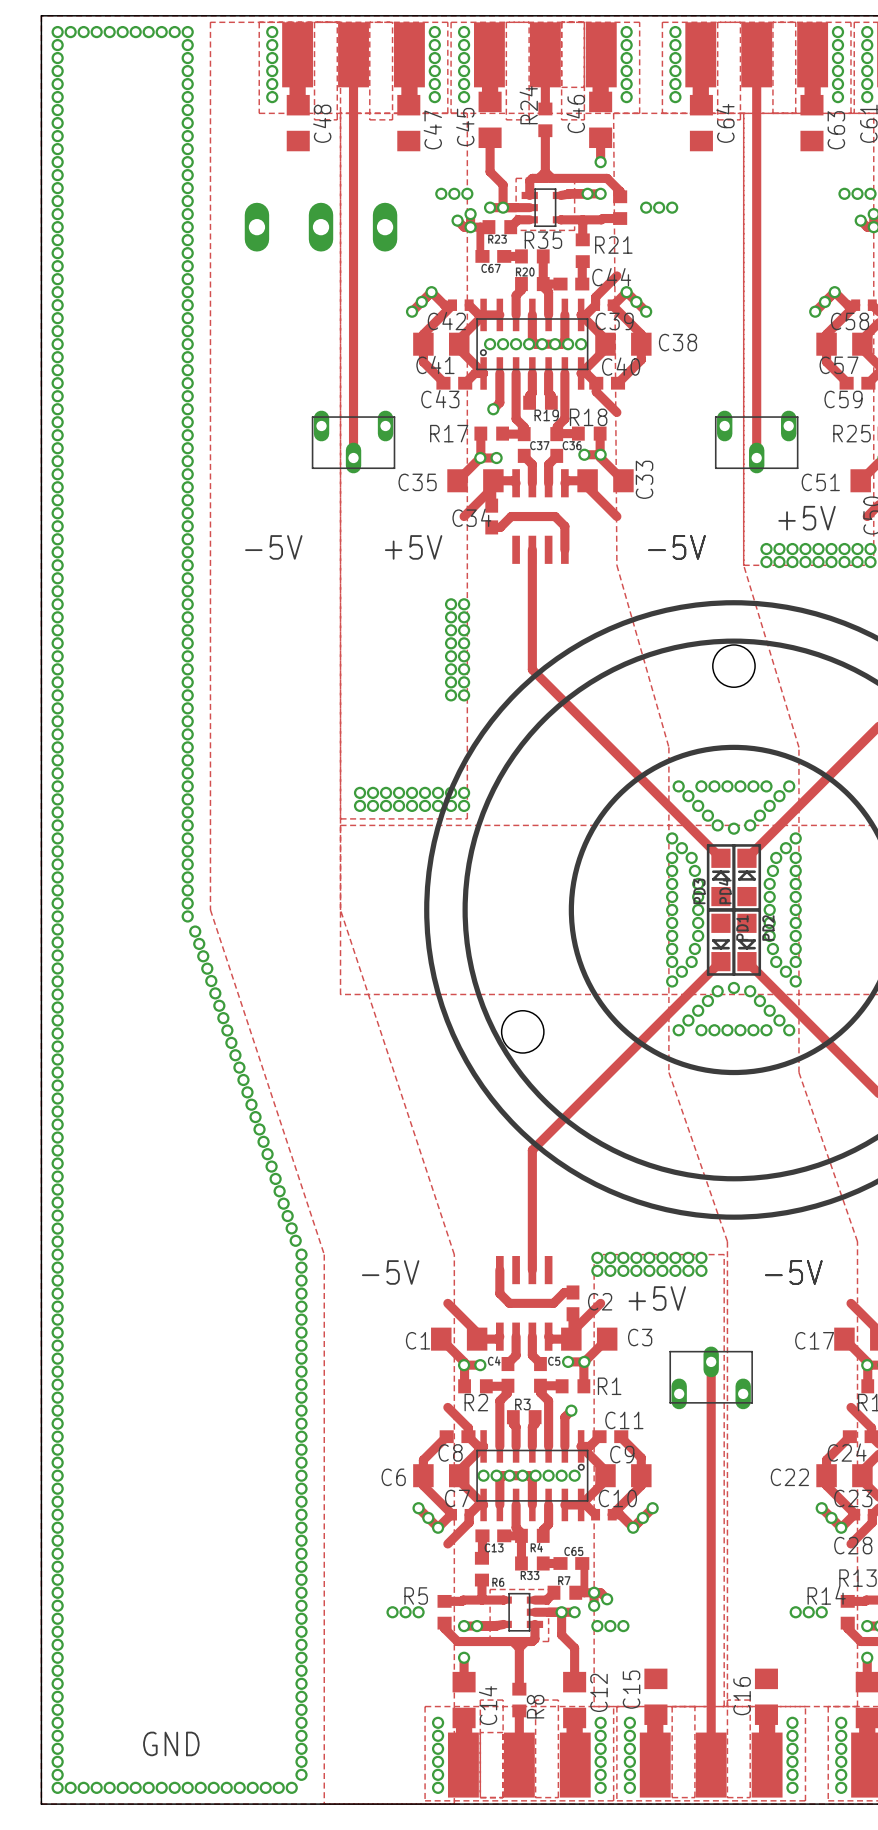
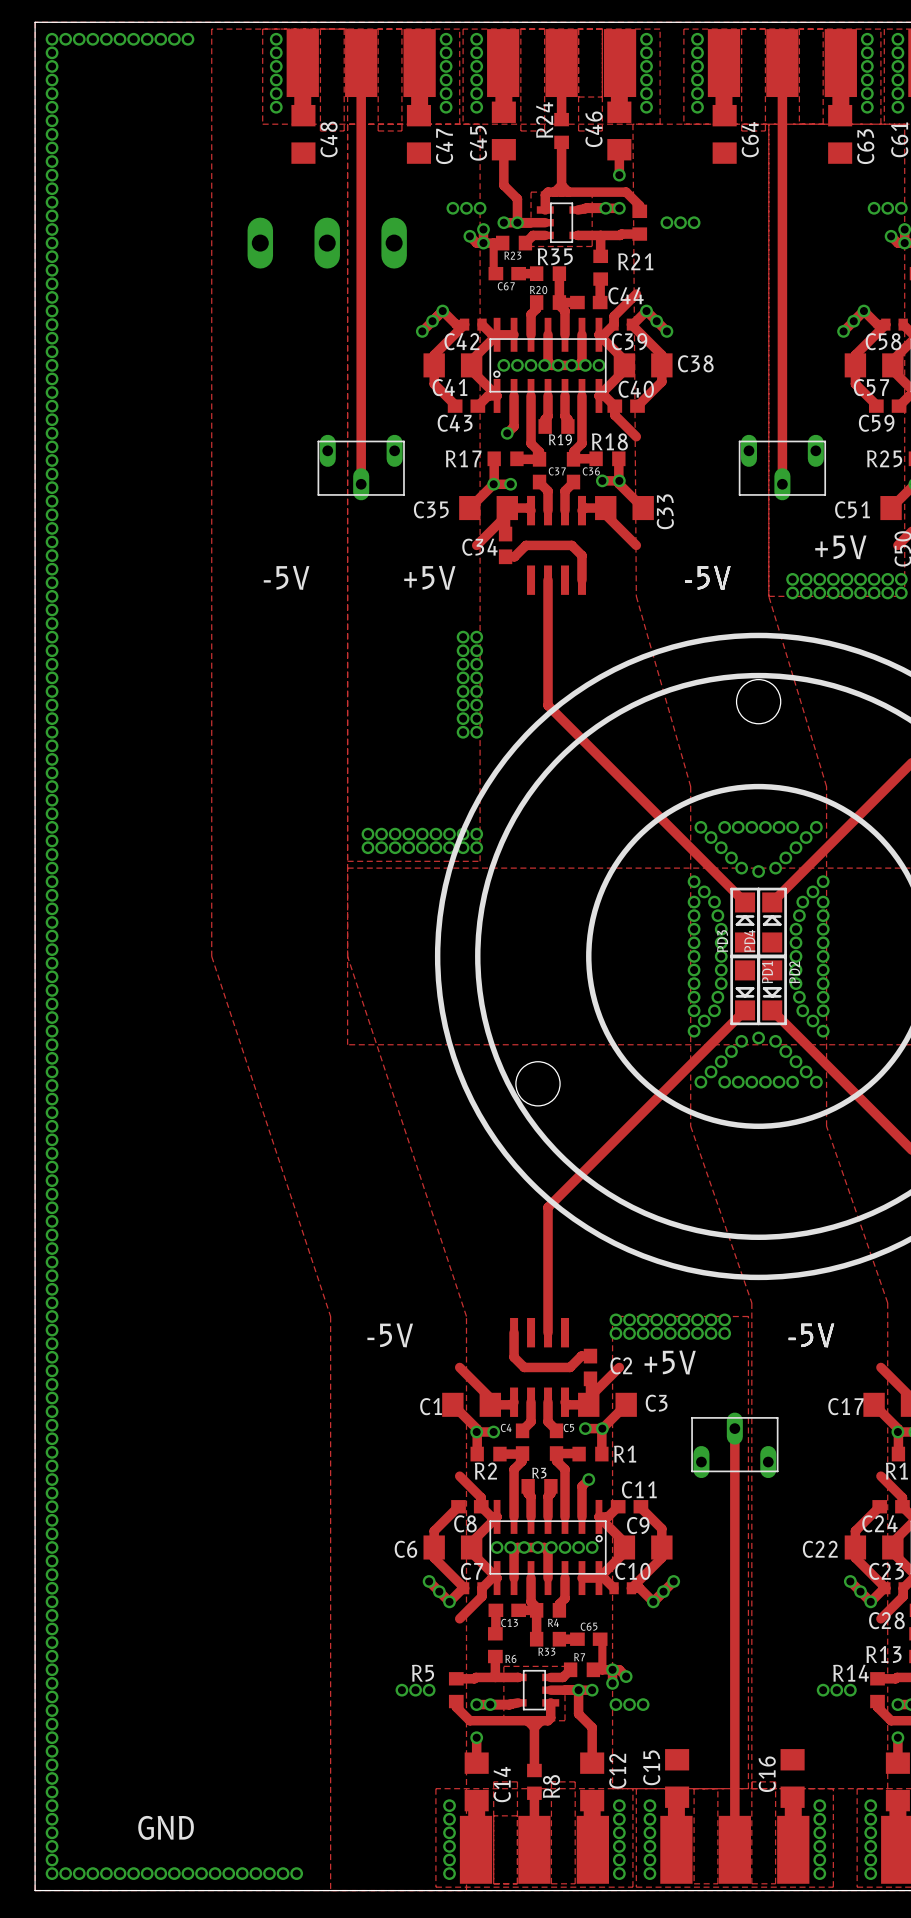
via: (187, 45) -> none
via: (187, 58) -> none
via: (187, 71) -> none
via: (187, 84) -> none
via: (187, 97) -> none
via: (187, 110) -> none
via: (187, 123) -> none
via: (187, 136) -> none
via: (187, 149) -> none
via: (187, 162) -> none
via: (187, 175) -> none
via: (187, 188) -> none
via: (187, 201) -> none
via: (187, 214) -> none
via: (187, 227) -> none
via: (187, 240) -> none
via: (187, 253) -> none
via: (187, 266) -> none
via: (187, 279) -> none
via: (187, 292) -> none
via: (187, 305) -> none
via: (187, 318) -> none
via: (187, 331) -> none
via: (187, 344) -> none
via: (187, 357) -> none
via: (187, 370) -> none
via: (187, 383) -> none
via: (187, 396) -> none
via: (187, 409) -> none
via: (187, 422) -> none
via: (187, 435) -> none
via: (187, 448) -> none
via: (187, 461) -> none
via: (187, 474) -> none
via: (187, 487) -> none
via: (187, 500) -> none
via: (187, 513) -> none
via: (187, 526) -> none
via: (187, 539) -> none
via: (187, 552) -> none
via: (187, 565) -> none
via: (187, 578) -> none
via: (187, 591) -> none
via: (187, 604) -> none
via: (187, 617) -> none
via: (187, 630) -> none
via: (187, 643) -> none
via: (187, 656) -> none
via: (187, 669) -> none
via: (187, 682) -> none
via: (187, 695) -> none
via: (187, 708) -> none
via: (187, 721) -> none
via: (187, 734) -> none
via: (187, 747) -> none
via: (187, 760) -> none
via: (187, 773) -> none
via: (187, 786) -> none
via: (187, 799) -> none
via: (187, 812) -> none
via: (187, 825) -> none
via: (187, 838) -> none
via: (187, 851) -> none
via: (187, 864) -> none
via: (187, 877) -> none
via: (187, 890) -> none
via: (187, 903) -> none
via: (187, 916) -> none
via: (195, 931) -> none
via: (199, 943) -> none
via: (203, 956) -> none
via: (207, 968) -> none
via: (211, 981) -> none
via: (215, 993) -> none
via: (219, 1005) -> none
via: (223, 1018) -> none
via: (227, 1030) -> none
via: (231, 1042) -> none
via: (235, 1055) -> none
via: (239, 1067) -> none
via: (243, 1079) -> none
via: (247, 1092) -> none
via: (251, 1104) -> none
via: (255, 1117) -> none
via: (259, 1129) -> none
via: (263, 1141) -> none
via: (267, 1154) -> none
via: (271, 1166) -> none
via: (275, 1178) -> none
via: (279, 1191) -> none
via: (283, 1203) -> none
via: (287, 1216) -> none
via: (291, 1228) -> none
via: (295, 1240) -> none
via: (301, 1254) -> none
via: (301, 1267) -> none
via: (301, 1280) -> none
via: (301, 1293) -> none
via: (301, 1306) -> none
via: (301, 1319) -> none
via: (301, 1332) -> none
via: (301, 1345) -> none
via: (301, 1358) -> none
via: (301, 1371) -> none
via: (301, 1384) -> none
via: (301, 1397) -> none
via: (301, 1410) -> none
via: (301, 1423) -> none
via: (301, 1436) -> none
via: (301, 1449) -> none
via: (301, 1462) -> none
via: (301, 1475) -> none
via: (301, 1488) -> none
via: (301, 1501) -> none
via: (301, 1514) -> none
via: (301, 1527) -> none
via: (301, 1540) -> none
via: (301, 1553) -> none
via: (301, 1566) -> none
via: (301, 1579) -> none
via: (301, 1592) -> none
via: (301, 1605) -> none
via: (301, 1618) -> none
via: (301, 1631) -> none
via: (301, 1644) -> none
via: (301, 1657) -> none
via: (301, 1670) -> none
via: (301, 1683) -> none
via: (301, 1696) -> none
via: (301, 1709) -> none
via: (301, 1722) -> none
via: (301, 1735) -> none
via: (301, 1748) -> none
via: (301, 1761) -> none
via: (301, 1774) -> none

